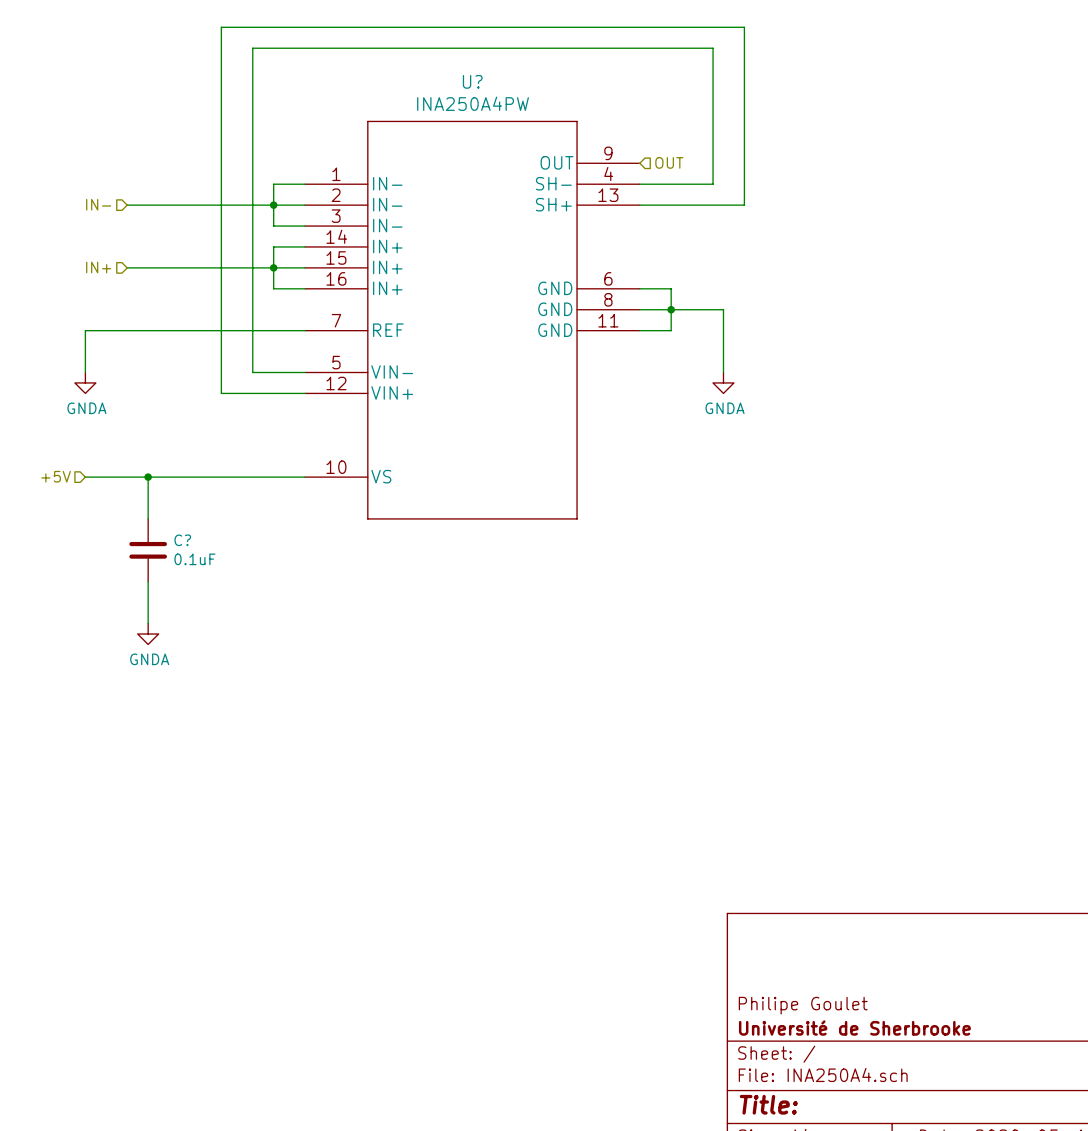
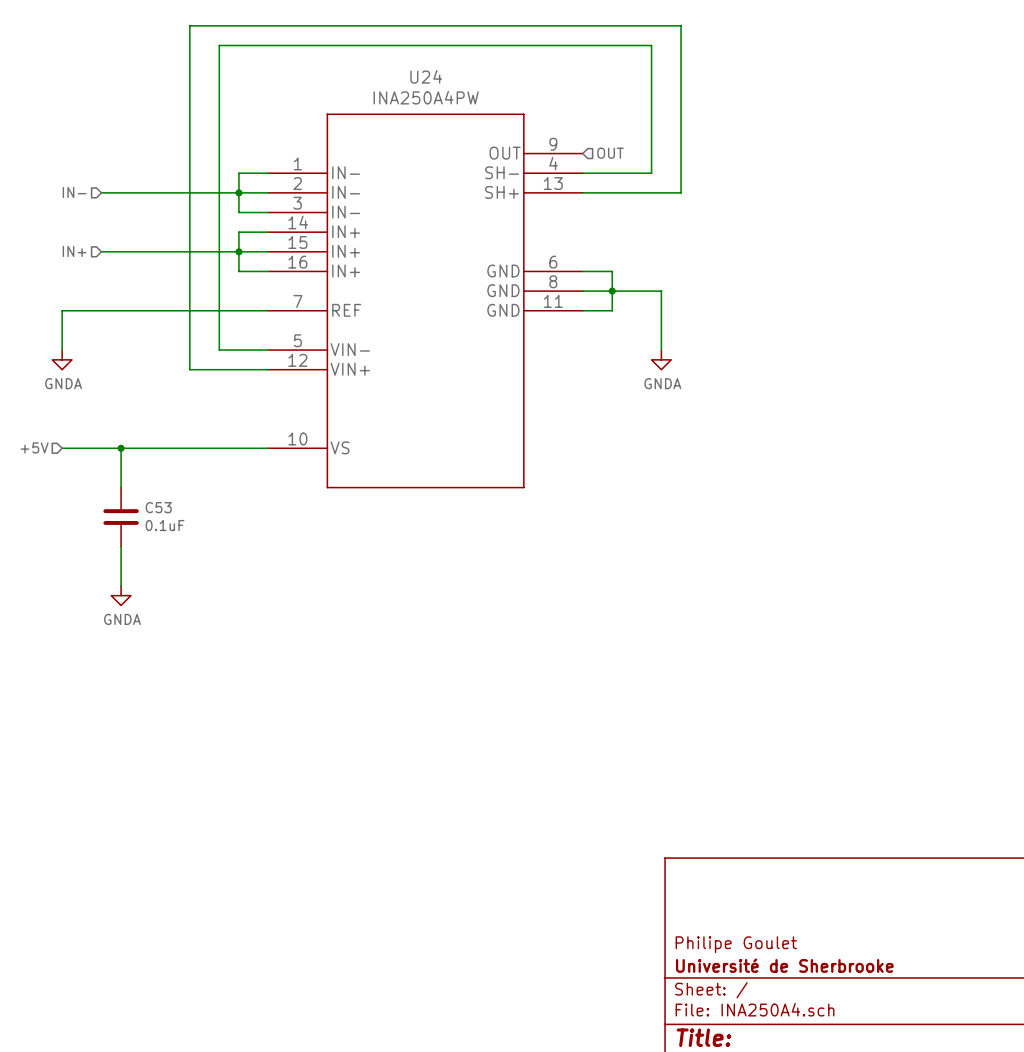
U? name: U? (472, 81) -> U24 (426, 76)
C? name: C? (182, 540) -> C53 (158, 507)

